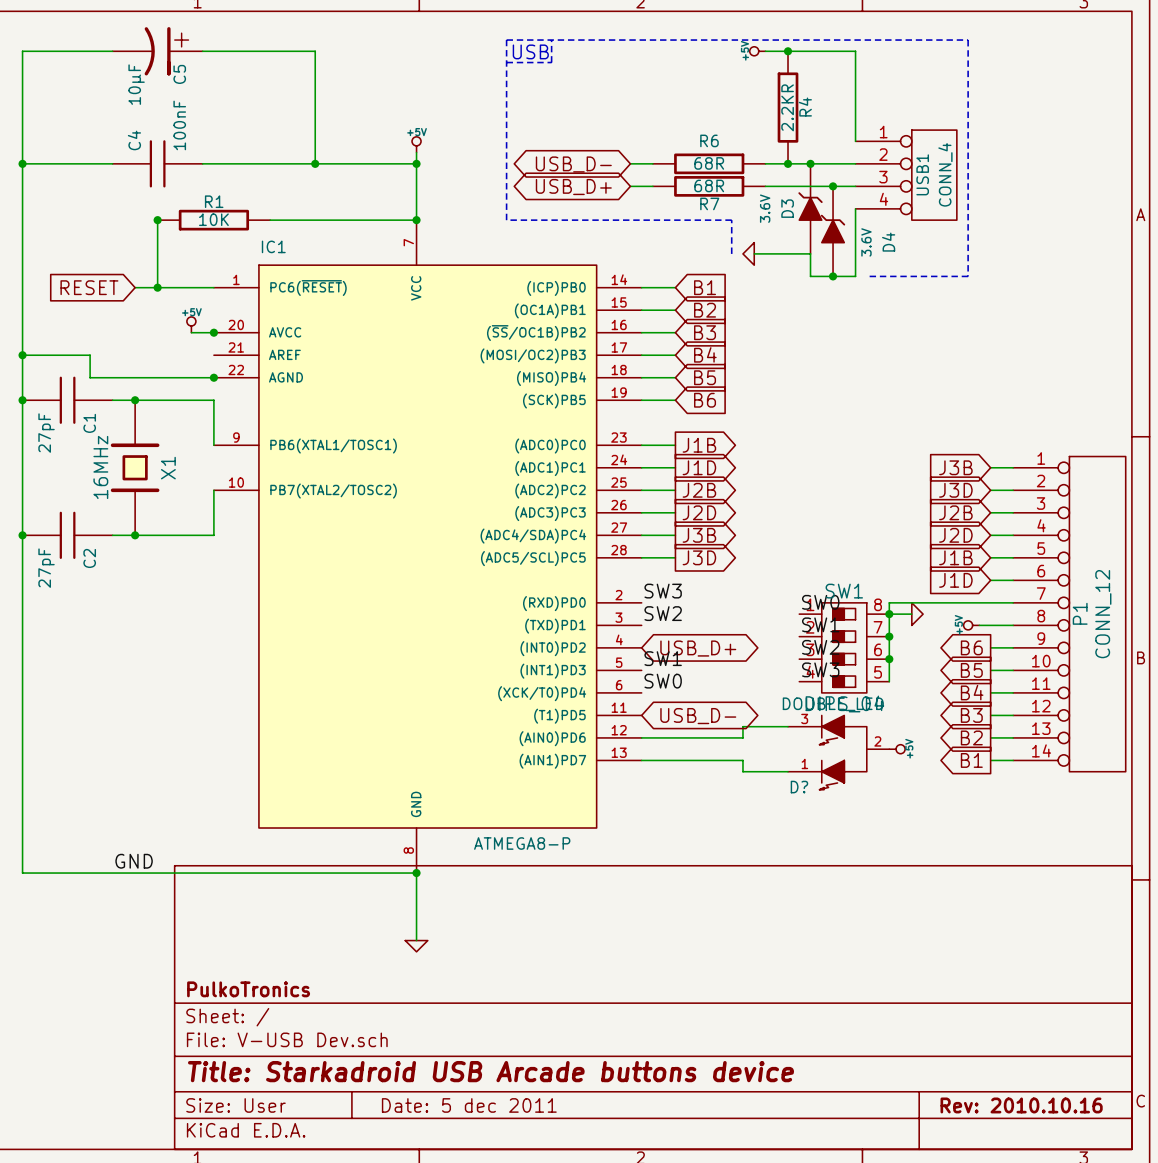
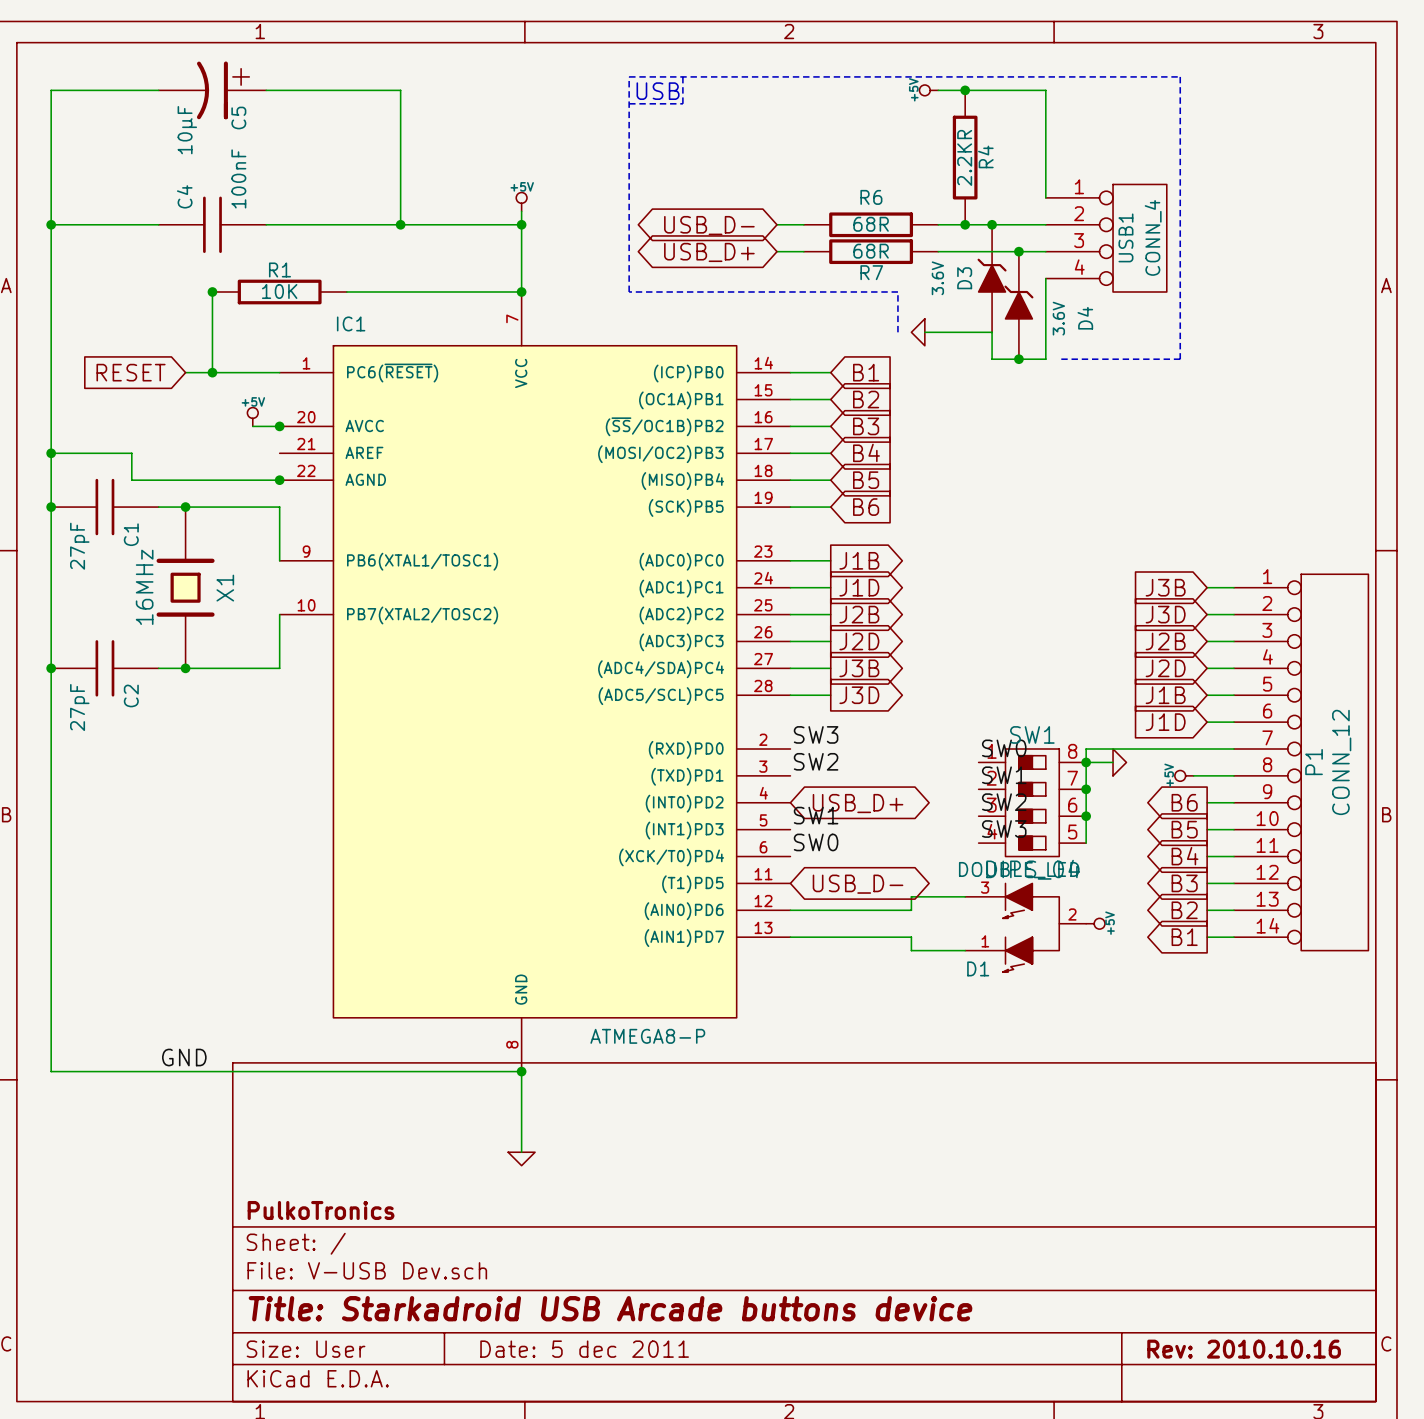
D? name: D? (799, 787) -> D1 (978, 968)

